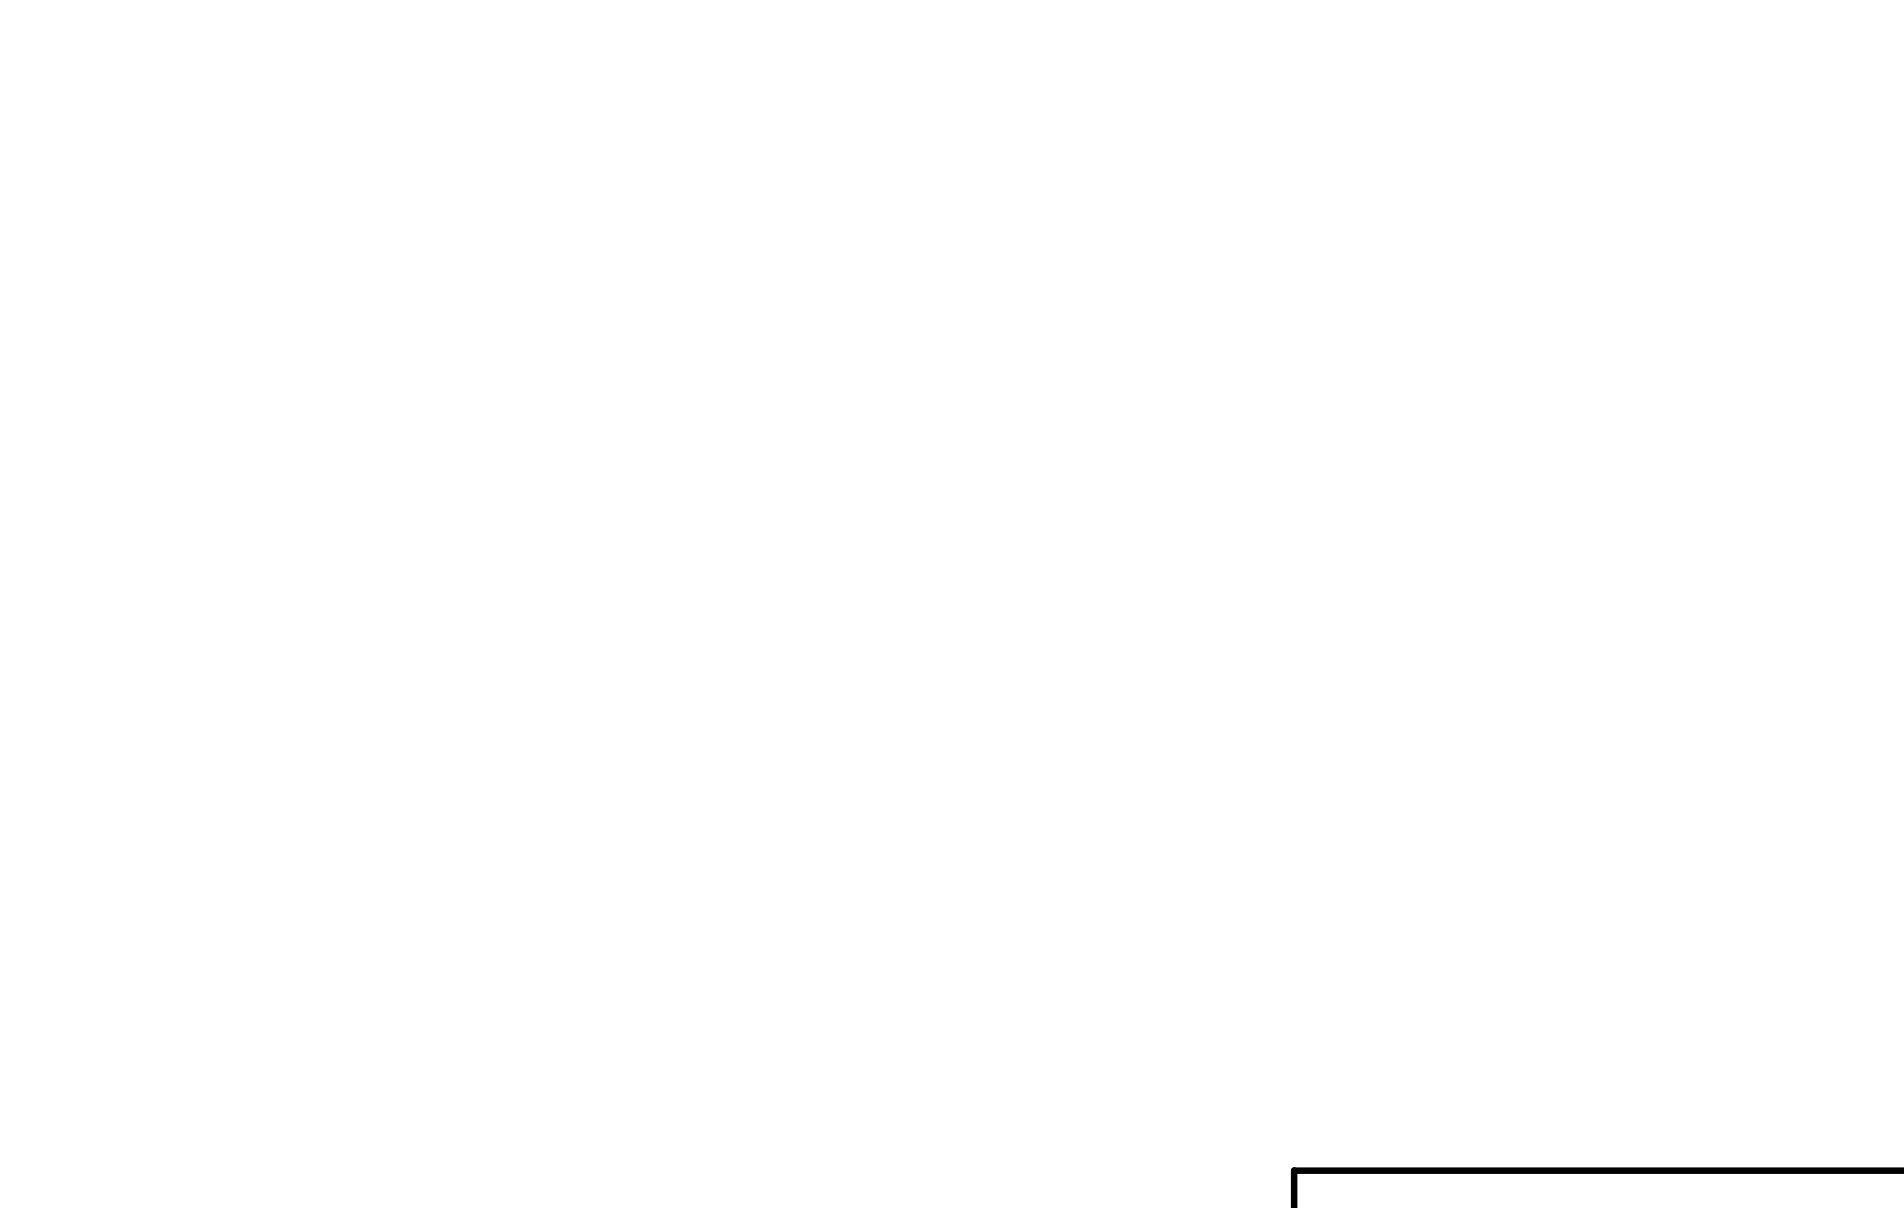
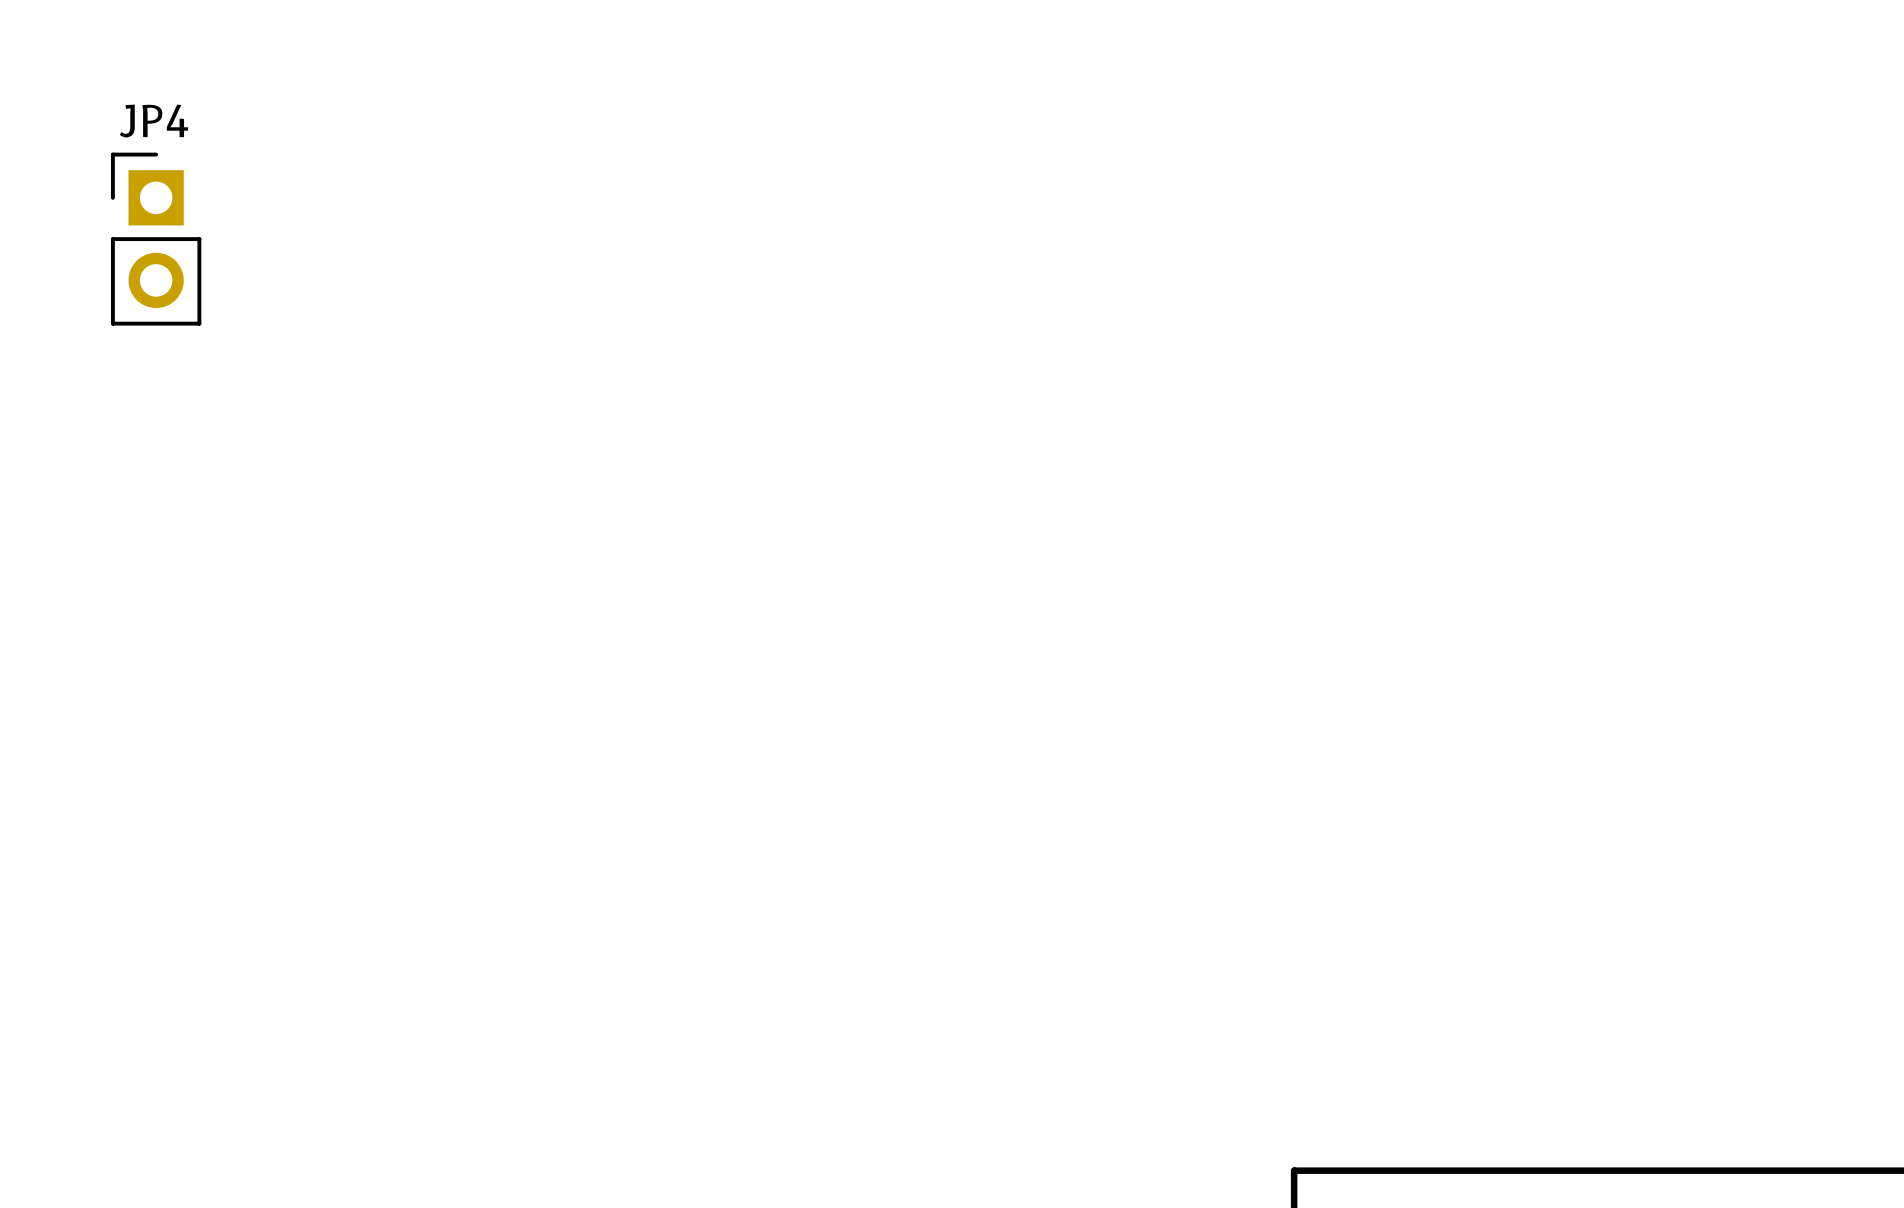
JP4: none -> (156, 239)

